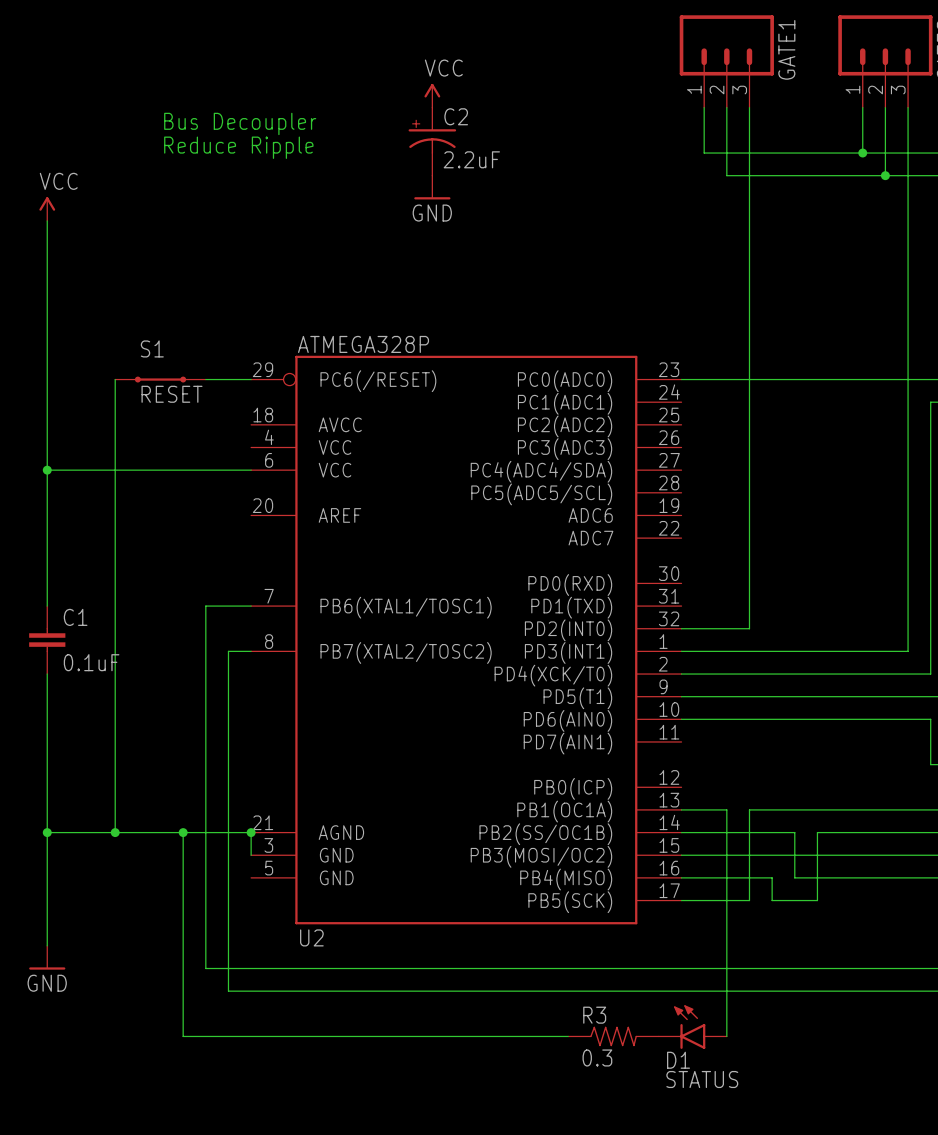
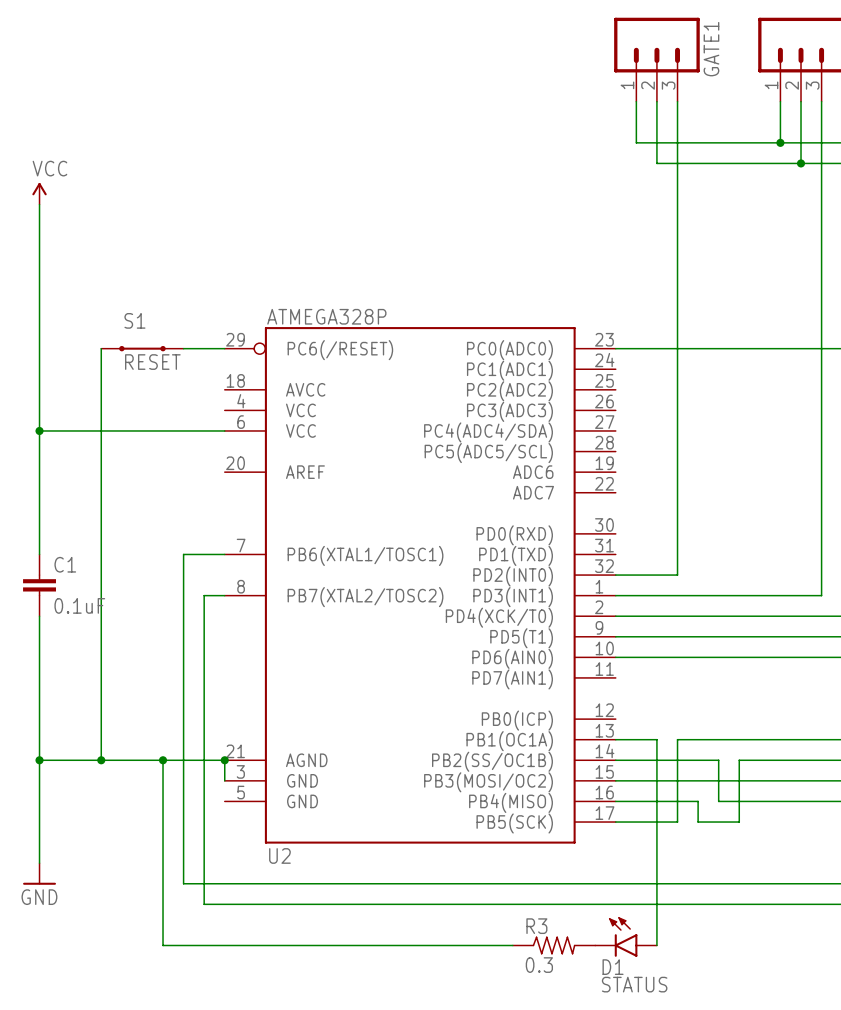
power symbol: VCC (432, 95) -> none
text: Bus Decoupler (240, 123) -> none
C2: 2.2uF (432, 141) -> none
text: Reduce Ripple (238, 147) -> none
power symbol: GND (432, 187) -> none

